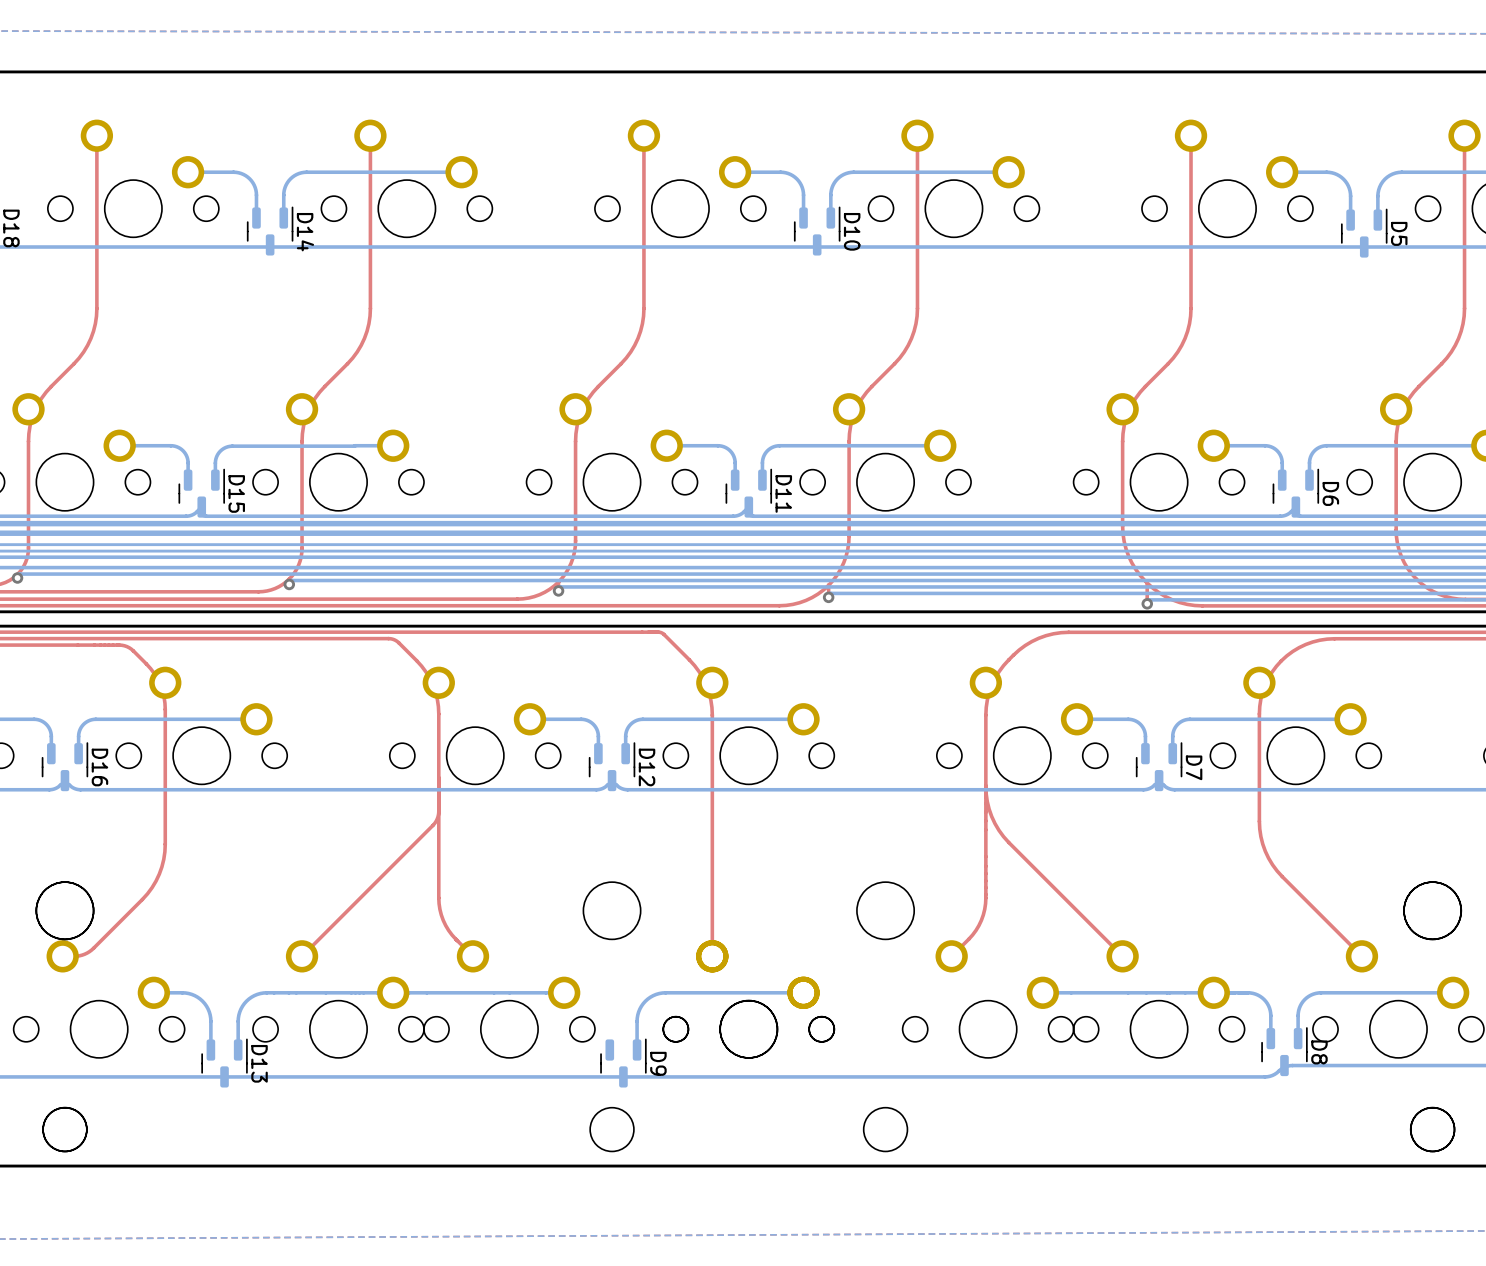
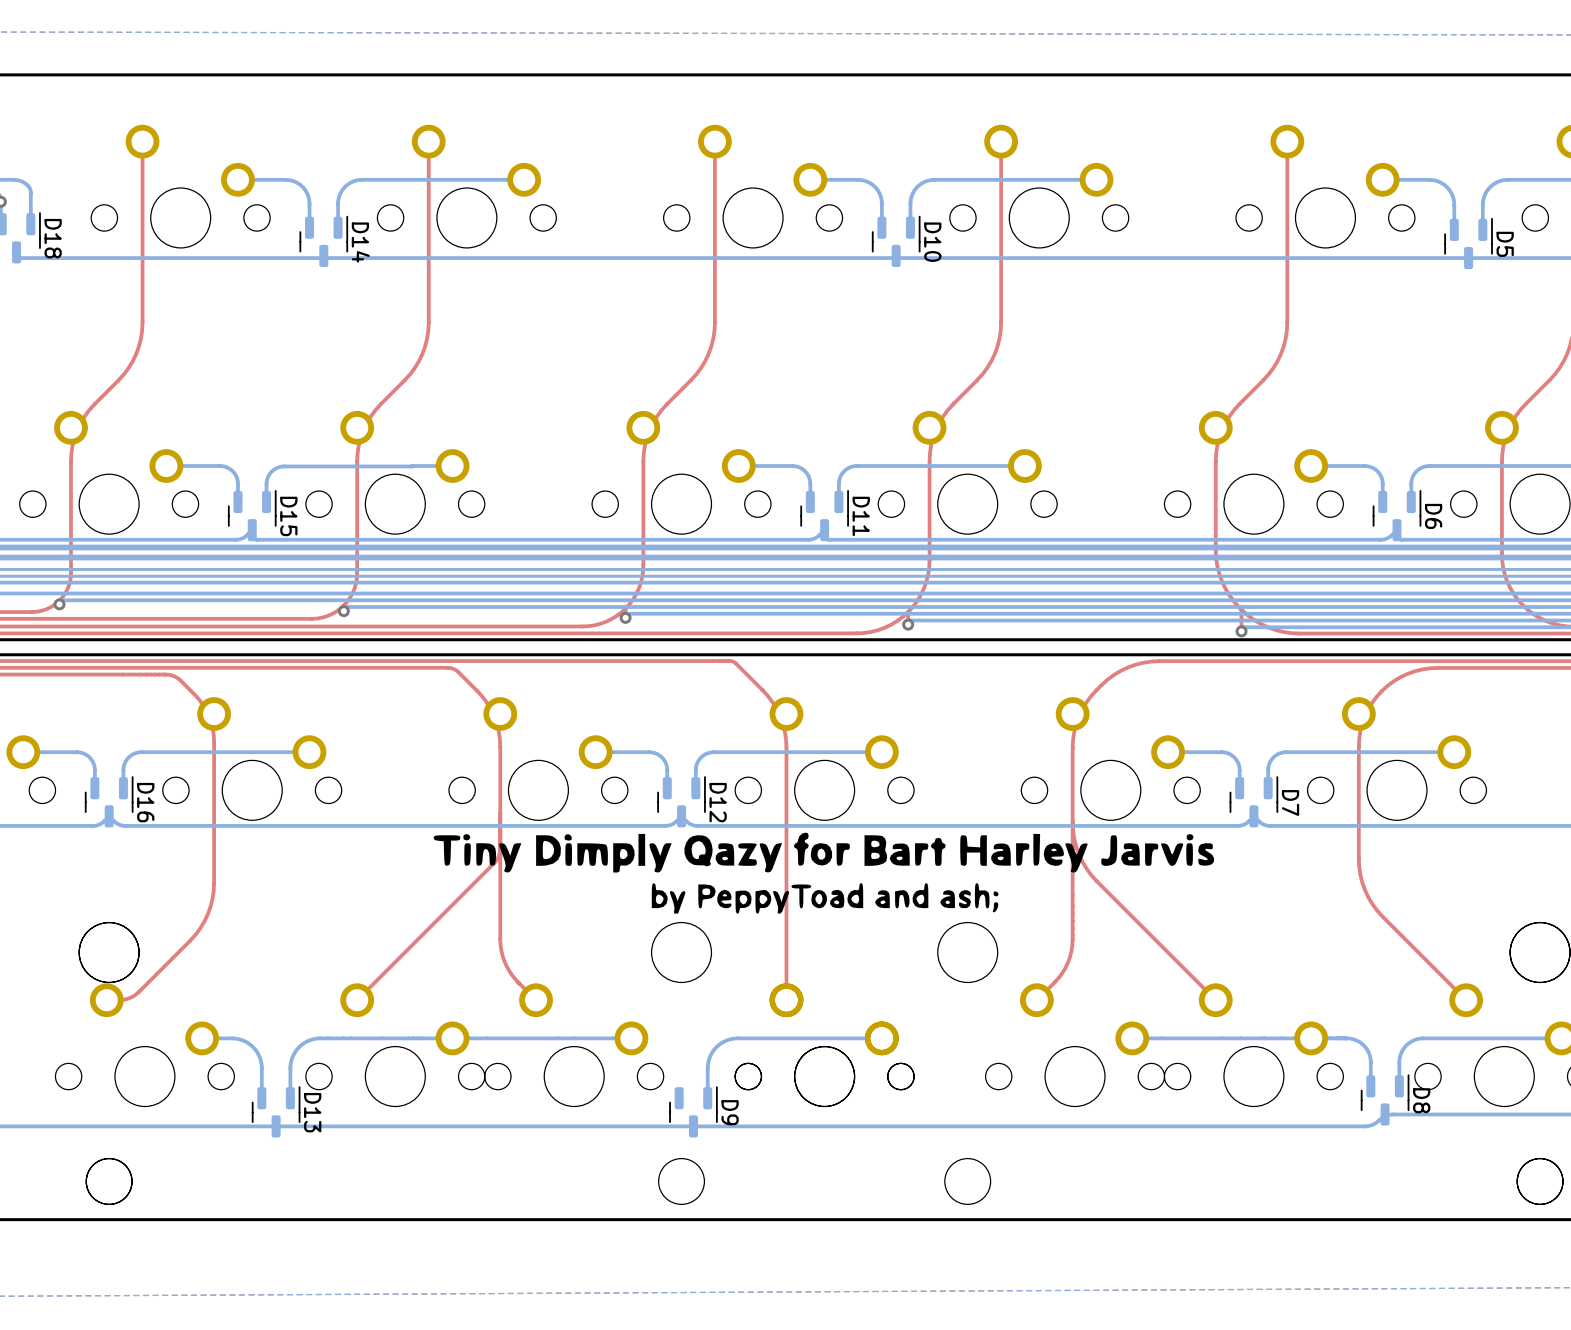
drawing: none -> [433, 832, 1215, 914]

